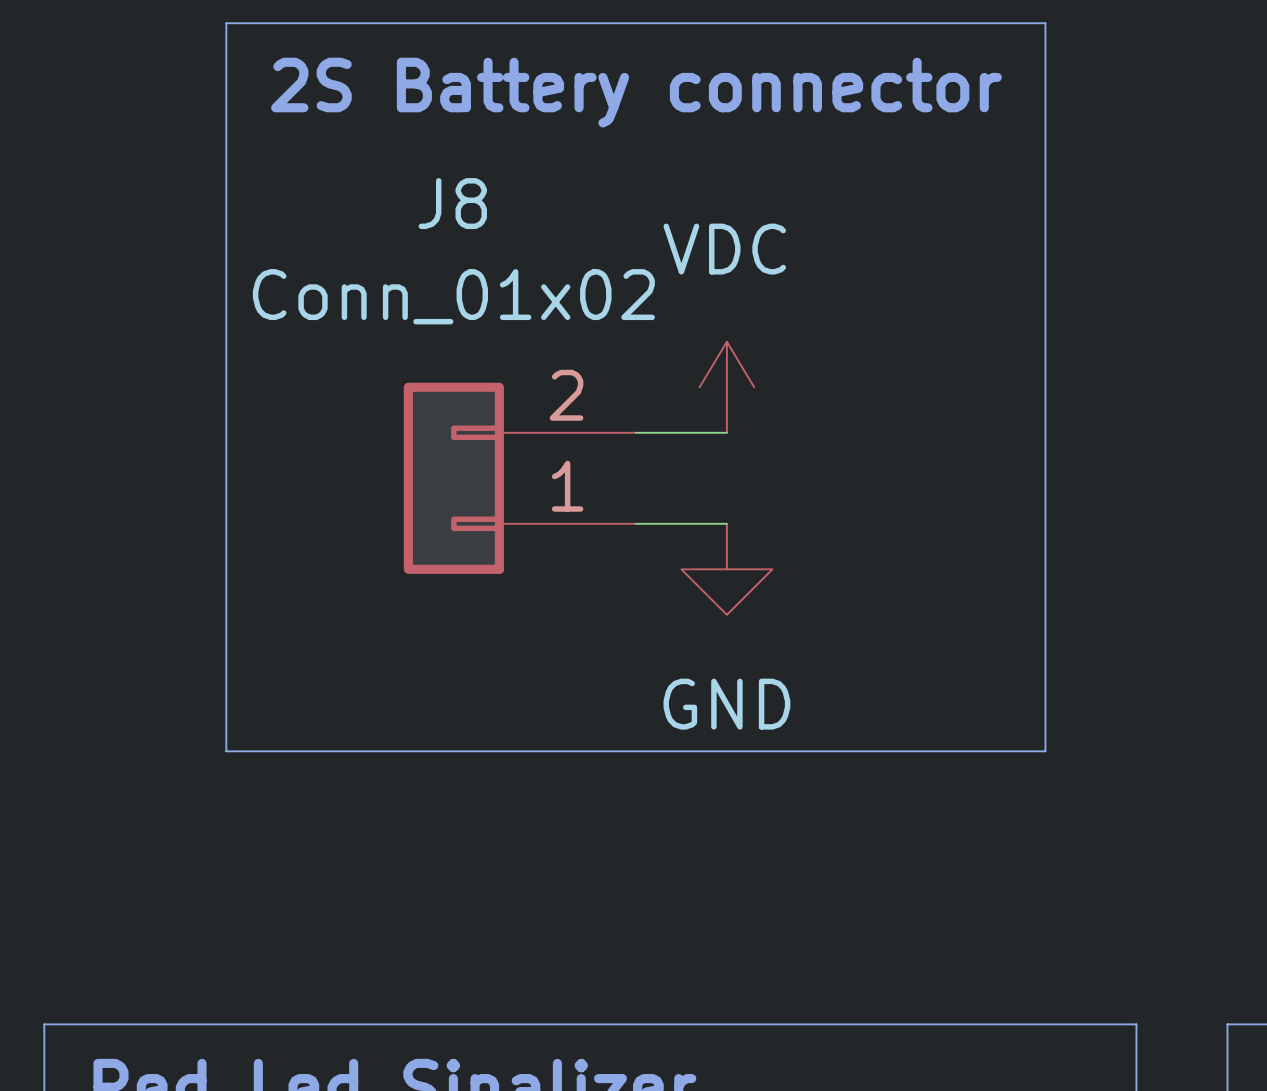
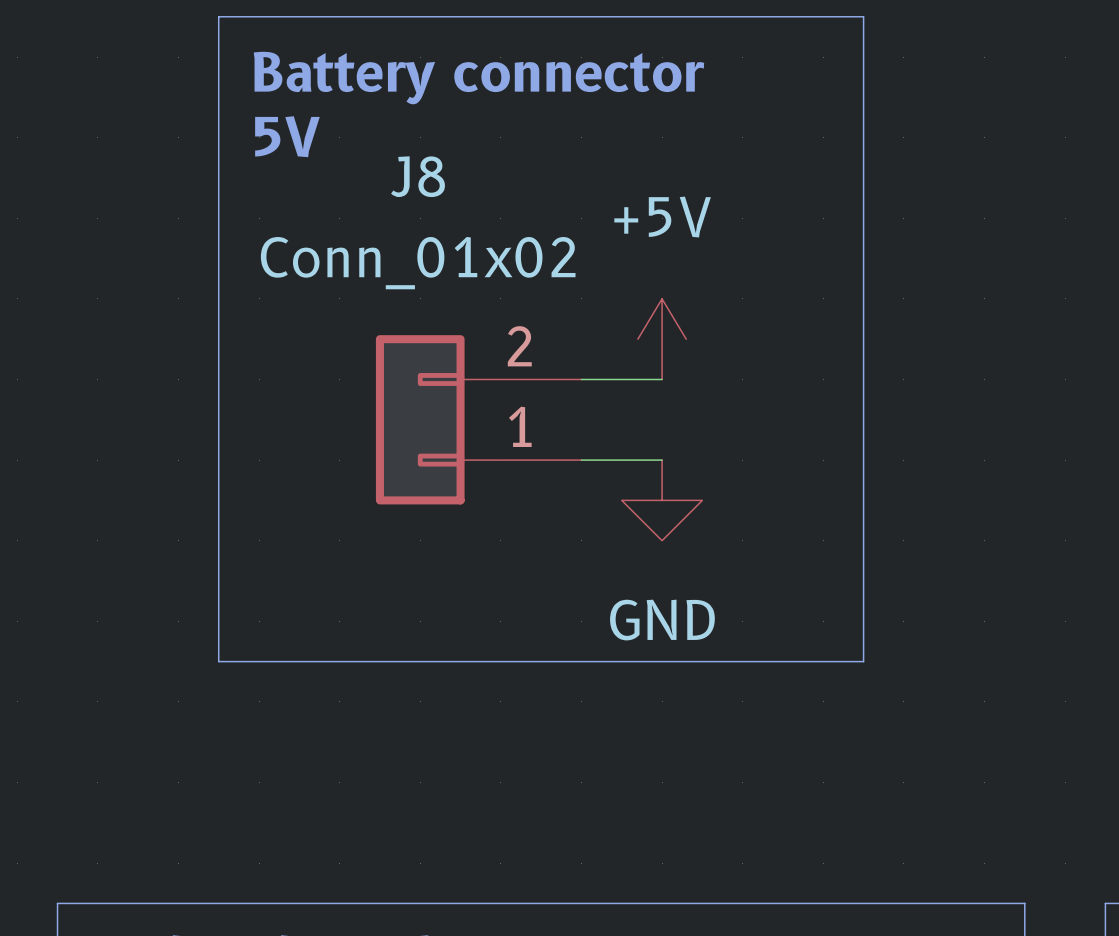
line: (954, 23) (1045, 23) (1045, 751) (954, 751) -> (863, 16) (863, 661)
text: 2S Battery connector (636, 92) -> Battery connector (478, 78)
text: none -> 5V (287, 136)
power symbol: VDC (726, 387) -> +5V (662, 339)

